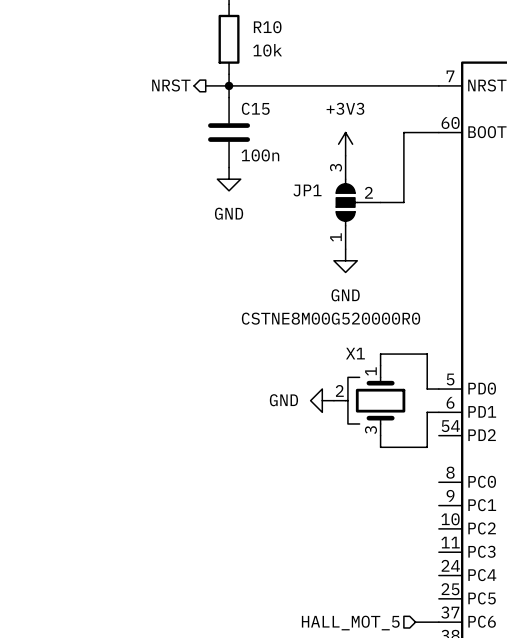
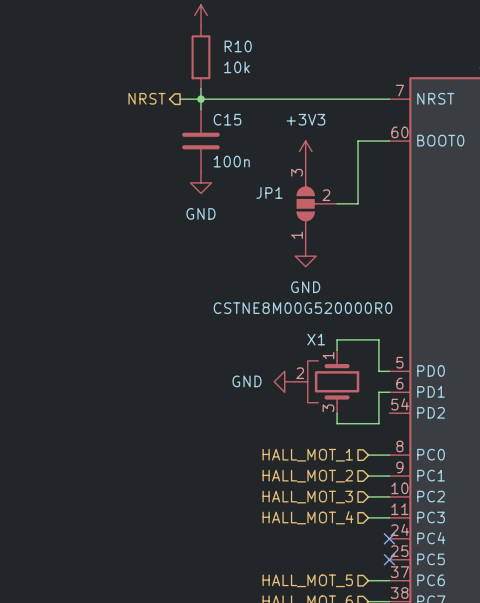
wire: none -> (368, 455) (389, 455)
hierarchical label: none -> HALL_MOT_1 (307, 455)
wire: none -> (368, 476) (389, 476)
hierarchical label: none -> HALL_MOT_2 (307, 476)
wire: none -> (368, 496) (389, 496)
hierarchical label: none -> HALL_MOT_3 (307, 497)
wire: none -> (368, 517) (389, 517)
hierarchical label: none -> HALL_MOT_4 (307, 517)
no-connect mark: none -> (389, 538)
no-connect mark: none -> (389, 559)

